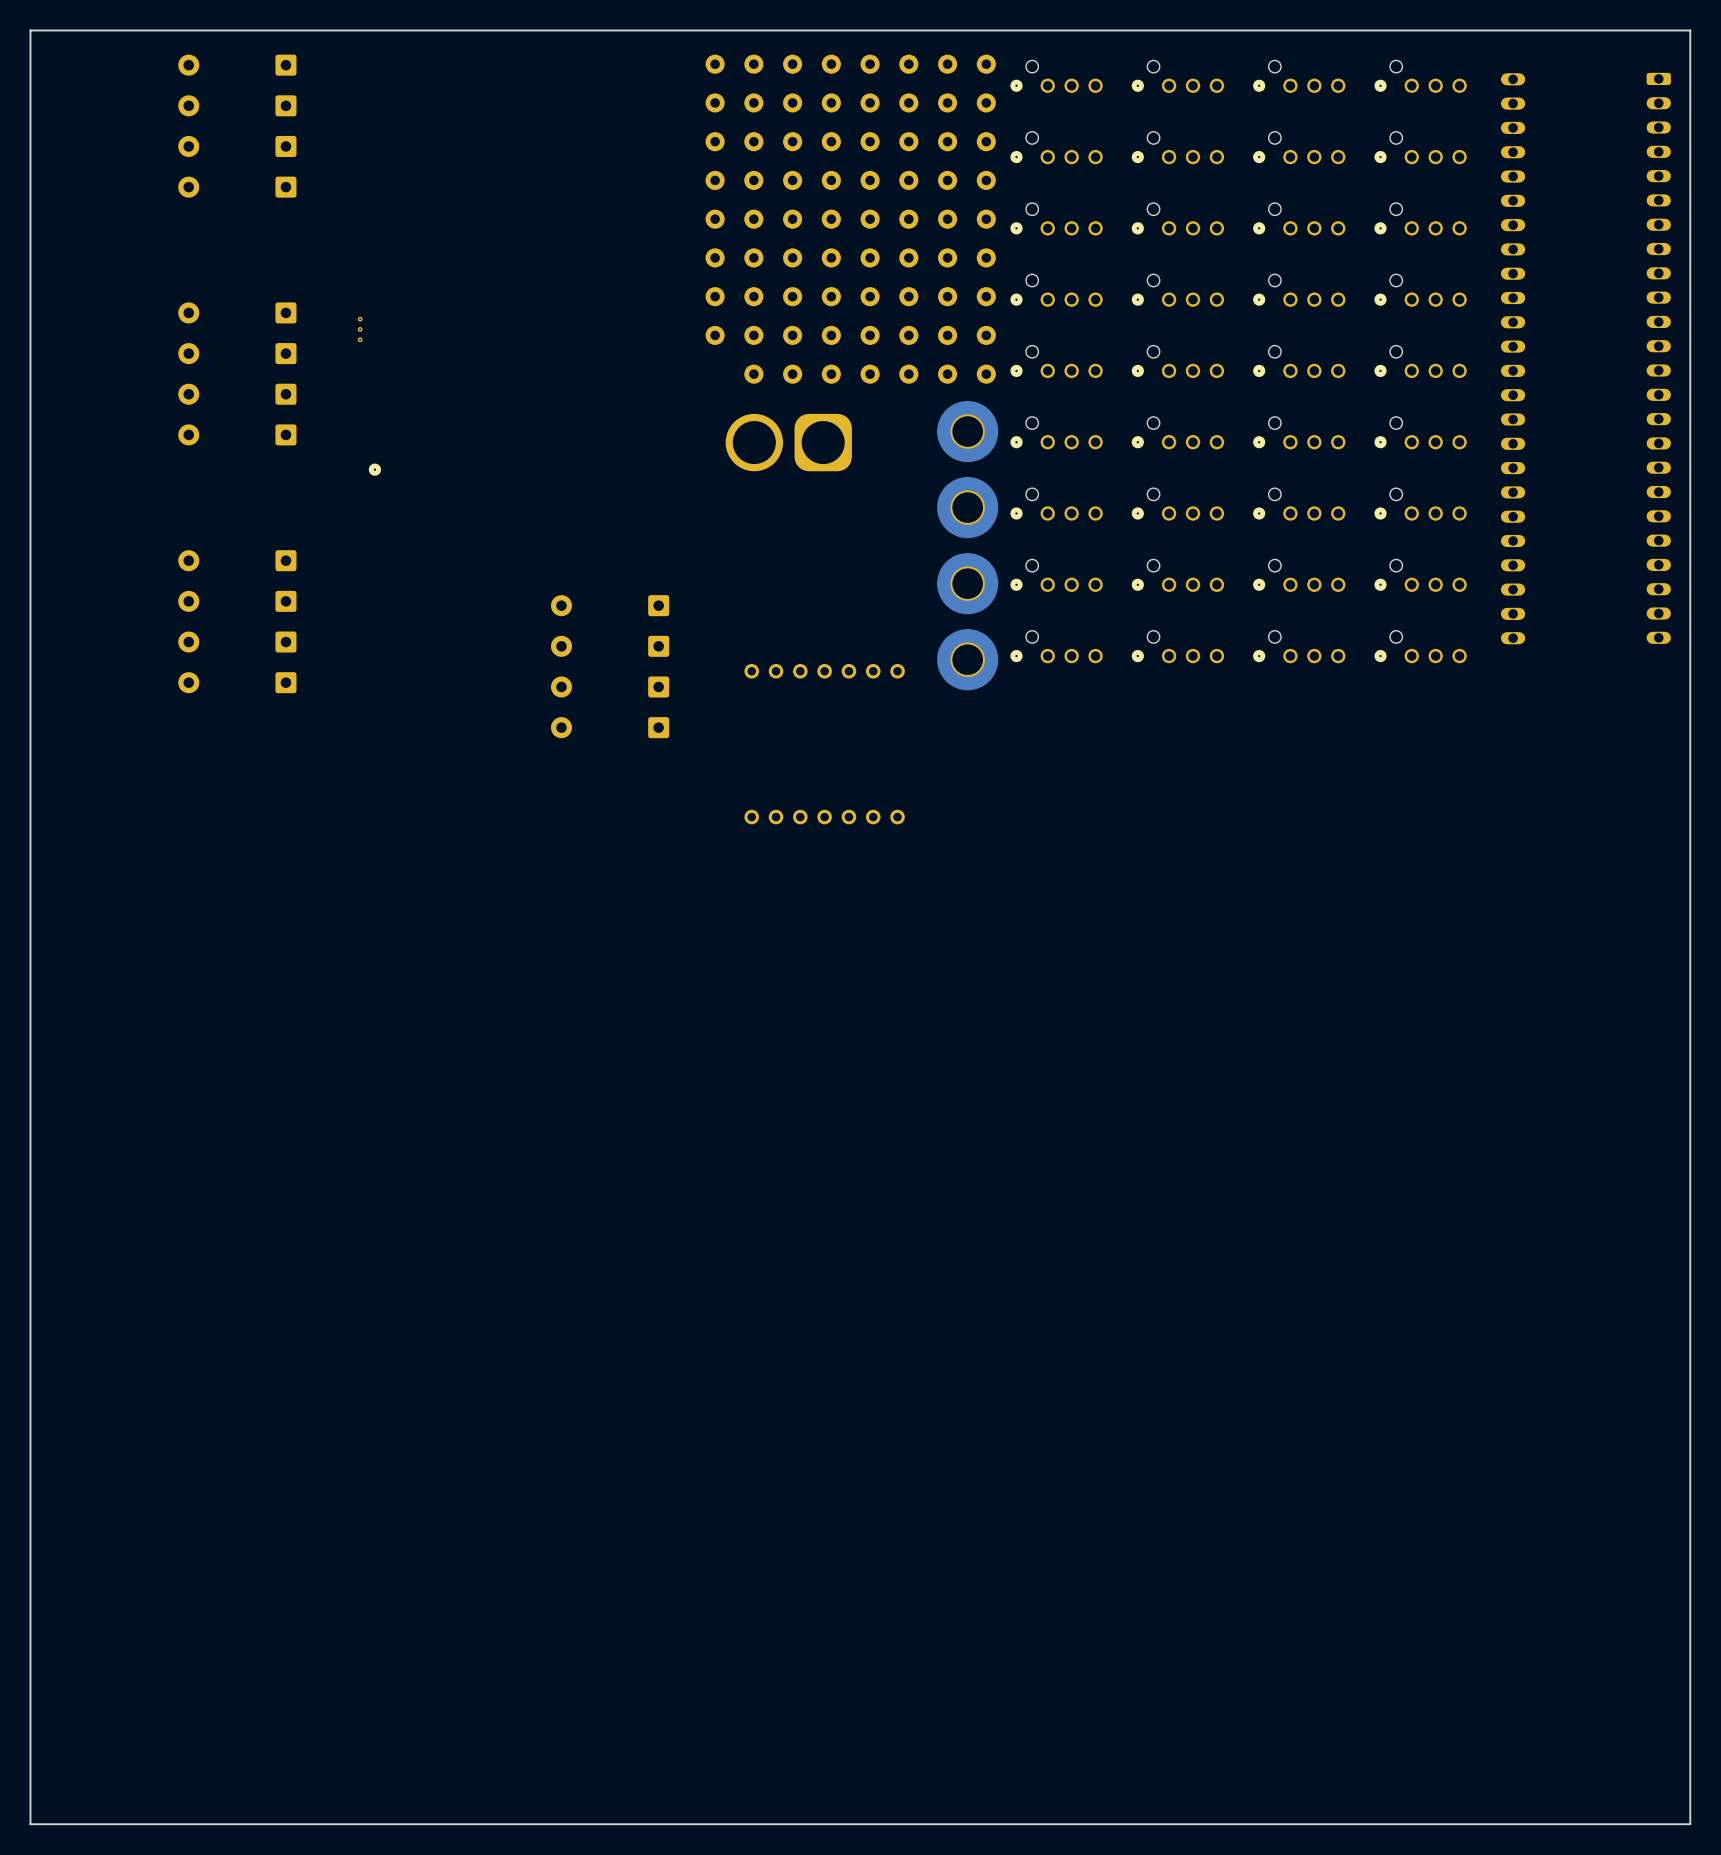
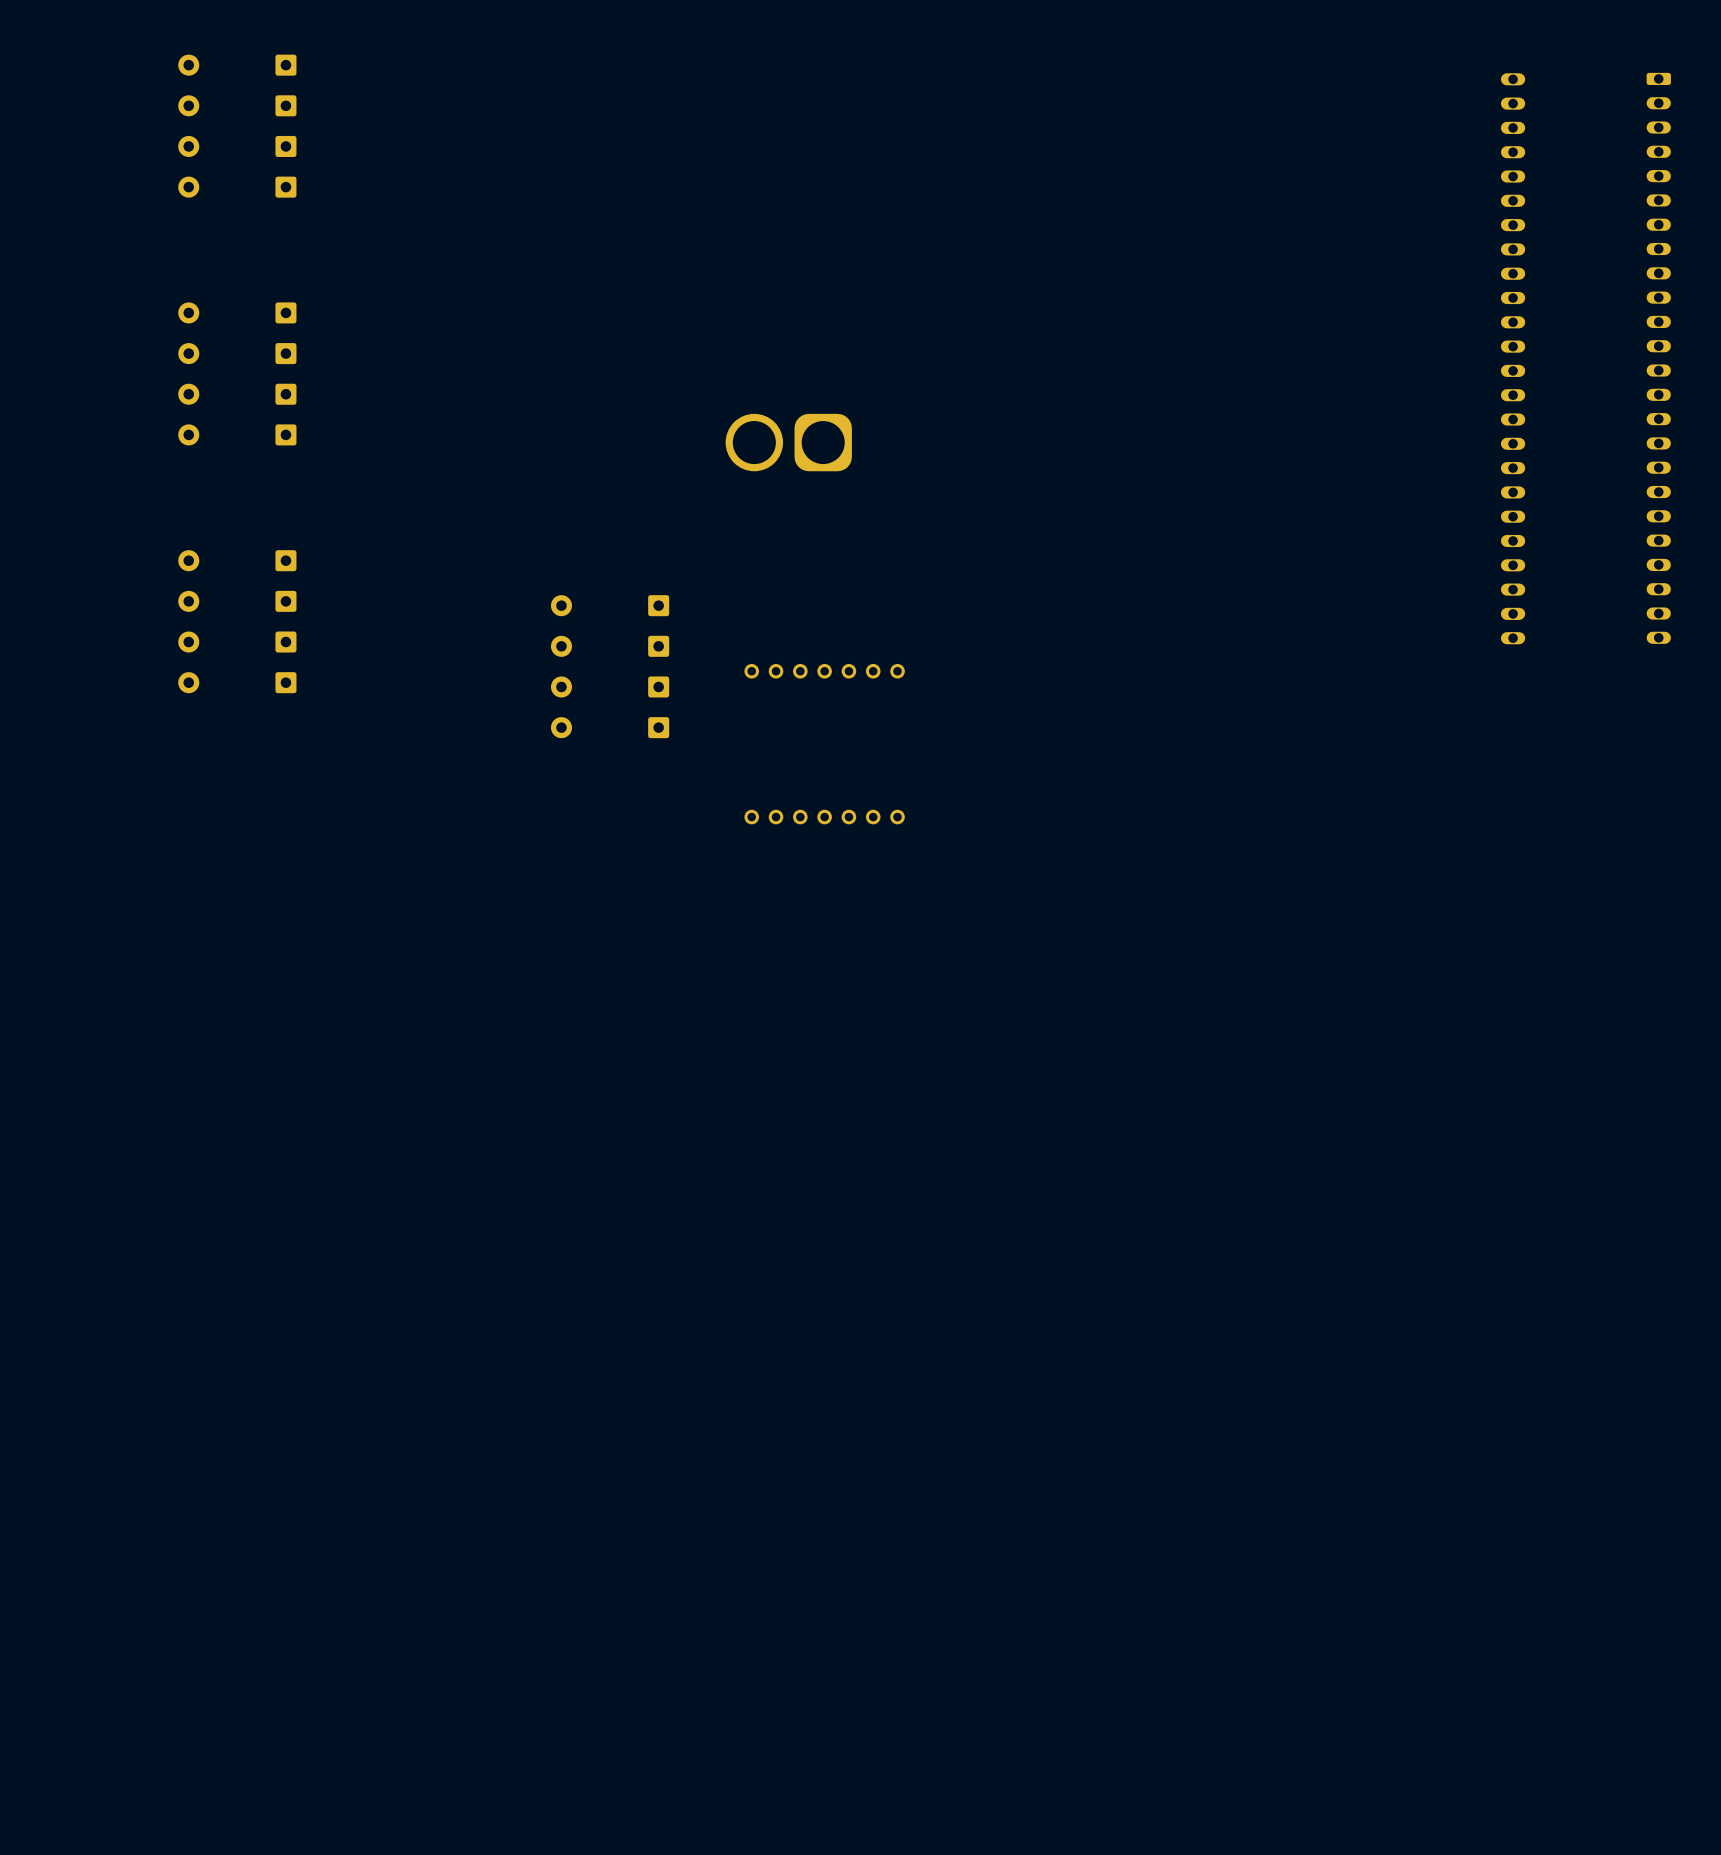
board edge: (1690, 30) (30, 30) (30, 1824) (1690, 1824) (1690, 30) -> none
part: (715, 64) -> none
part: (753, 64) -> none
part: (792, 64) -> none
part: (831, 64) -> none
part: (870, 64) -> none
part: (908, 64) -> none
part: (947, 64) -> none
part: (986, 64) -> none
part: (1056, 76) -> none
part: (1177, 76) -> none
part: (1299, 76) -> none
part: (1420, 76) -> none
part: (715, 102) -> none
part: (753, 102) -> none
part: (792, 102) -> none
part: (831, 102) -> none
part: (870, 102) -> none
part: (908, 102) -> none
part: (947, 102) -> none
part: (986, 102) -> none
part: (715, 141) -> none
part: (753, 141) -> none
part: (792, 141) -> none
part: (831, 141) -> none
part: (870, 141) -> none
part: (908, 141) -> none
part: (947, 141) -> none
part: (986, 141) -> none
part: (1056, 147) -> none
part: (1177, 147) -> none
part: (1299, 147) -> none
part: (1420, 147) -> none
part: (715, 180) -> none
part: (753, 180) -> none
part: (792, 180) -> none
part: (831, 180) -> none
part: (870, 180) -> none
part: (908, 180) -> none
part: (947, 180) -> none
part: (986, 180) -> none
part: (715, 219) -> none
part: (753, 219) -> none
part: (792, 219) -> none
part: (831, 219) -> none
part: (870, 219) -> none
part: (908, 219) -> none
part: (947, 219) -> none
part: (986, 219) -> none
part: (1056, 219) -> none
part: (1177, 219) -> none
part: (1299, 219) -> none
part: (1420, 219) -> none
part: (715, 257) -> none
part: (753, 257) -> none
part: (792, 257) -> none
part: (831, 257) -> none
part: (870, 257) -> none
part: (908, 257) -> none
part: (947, 257) -> none
part: (986, 257) -> none
part: (1056, 290) -> none
part: (1177, 290) -> none
part: (1299, 290) -> none
part: (1420, 290) -> none
part: (715, 296) -> none
part: (753, 296) -> none
part: (792, 296) -> none
part: (831, 296) -> none
part: (870, 296) -> none
part: (908, 296) -> none
part: (947, 296) -> none
part: (986, 296) -> none
part: (360, 329) -> none
part: (715, 335) -> none
part: (753, 335) -> none
part: (792, 335) -> none
part: (831, 335) -> none
part: (870, 335) -> none
part: (908, 335) -> none
part: (947, 335) -> none
part: (986, 335) -> none
part: (1056, 361) -> none
part: (1177, 361) -> none
part: (1299, 361) -> none
part: (1420, 361) -> none
part: (753, 374) -> none
part: (792, 374) -> none
part: (831, 374) -> none
part: (870, 374) -> none
part: (908, 374) -> none
part: (947, 374) -> none
part: (986, 374) -> none
part: (967, 431) -> none
part: (1056, 433) -> none
part: (1177, 433) -> none
part: (1299, 433) -> none
part: (1420, 433) -> none
part: (374, 469) -> none
part: (1056, 504) -> none
part: (1177, 504) -> none
part: (1299, 504) -> none
part: (1420, 504) -> none
part: (967, 507) -> none
part: (1056, 575) -> none
part: (1177, 575) -> none
part: (1299, 575) -> none
part: (1420, 575) -> none
part: (967, 583) -> none
part: (1056, 646) -> none
part: (1177, 646) -> none
part: (1299, 646) -> none
part: (1420, 646) -> none
part: (967, 659) -> none

